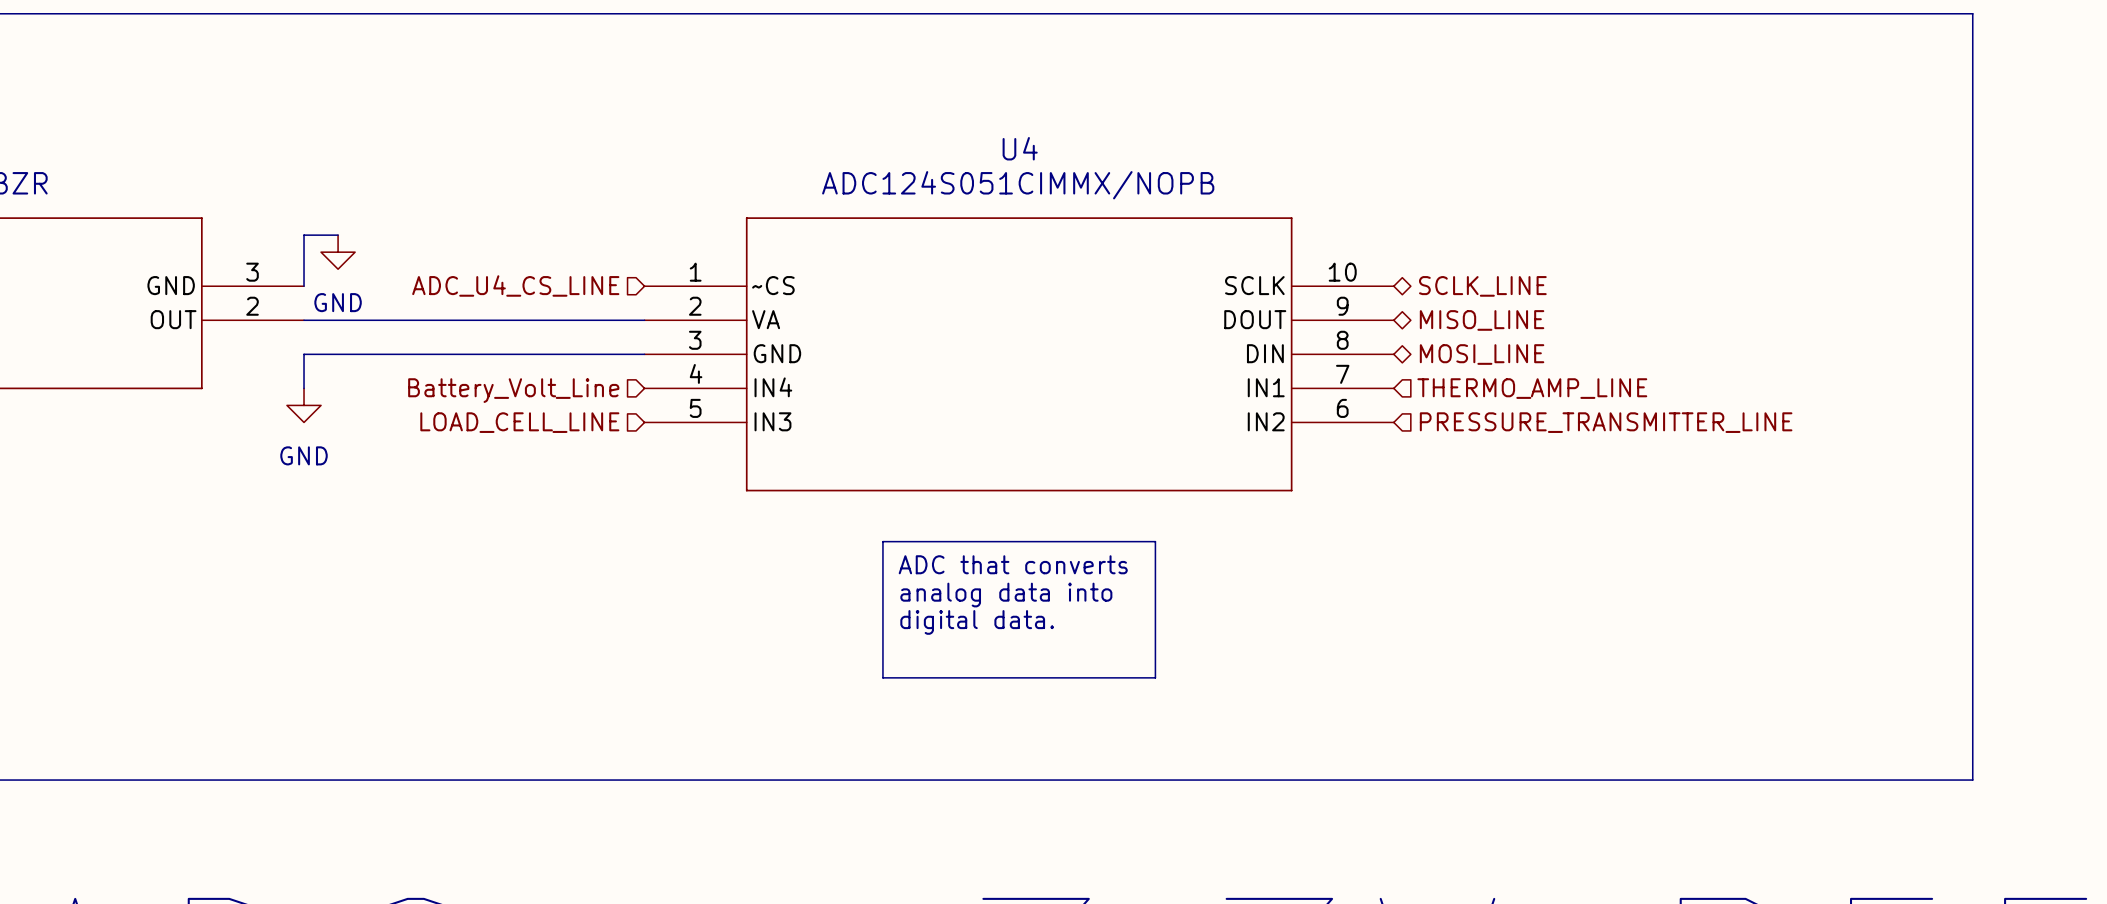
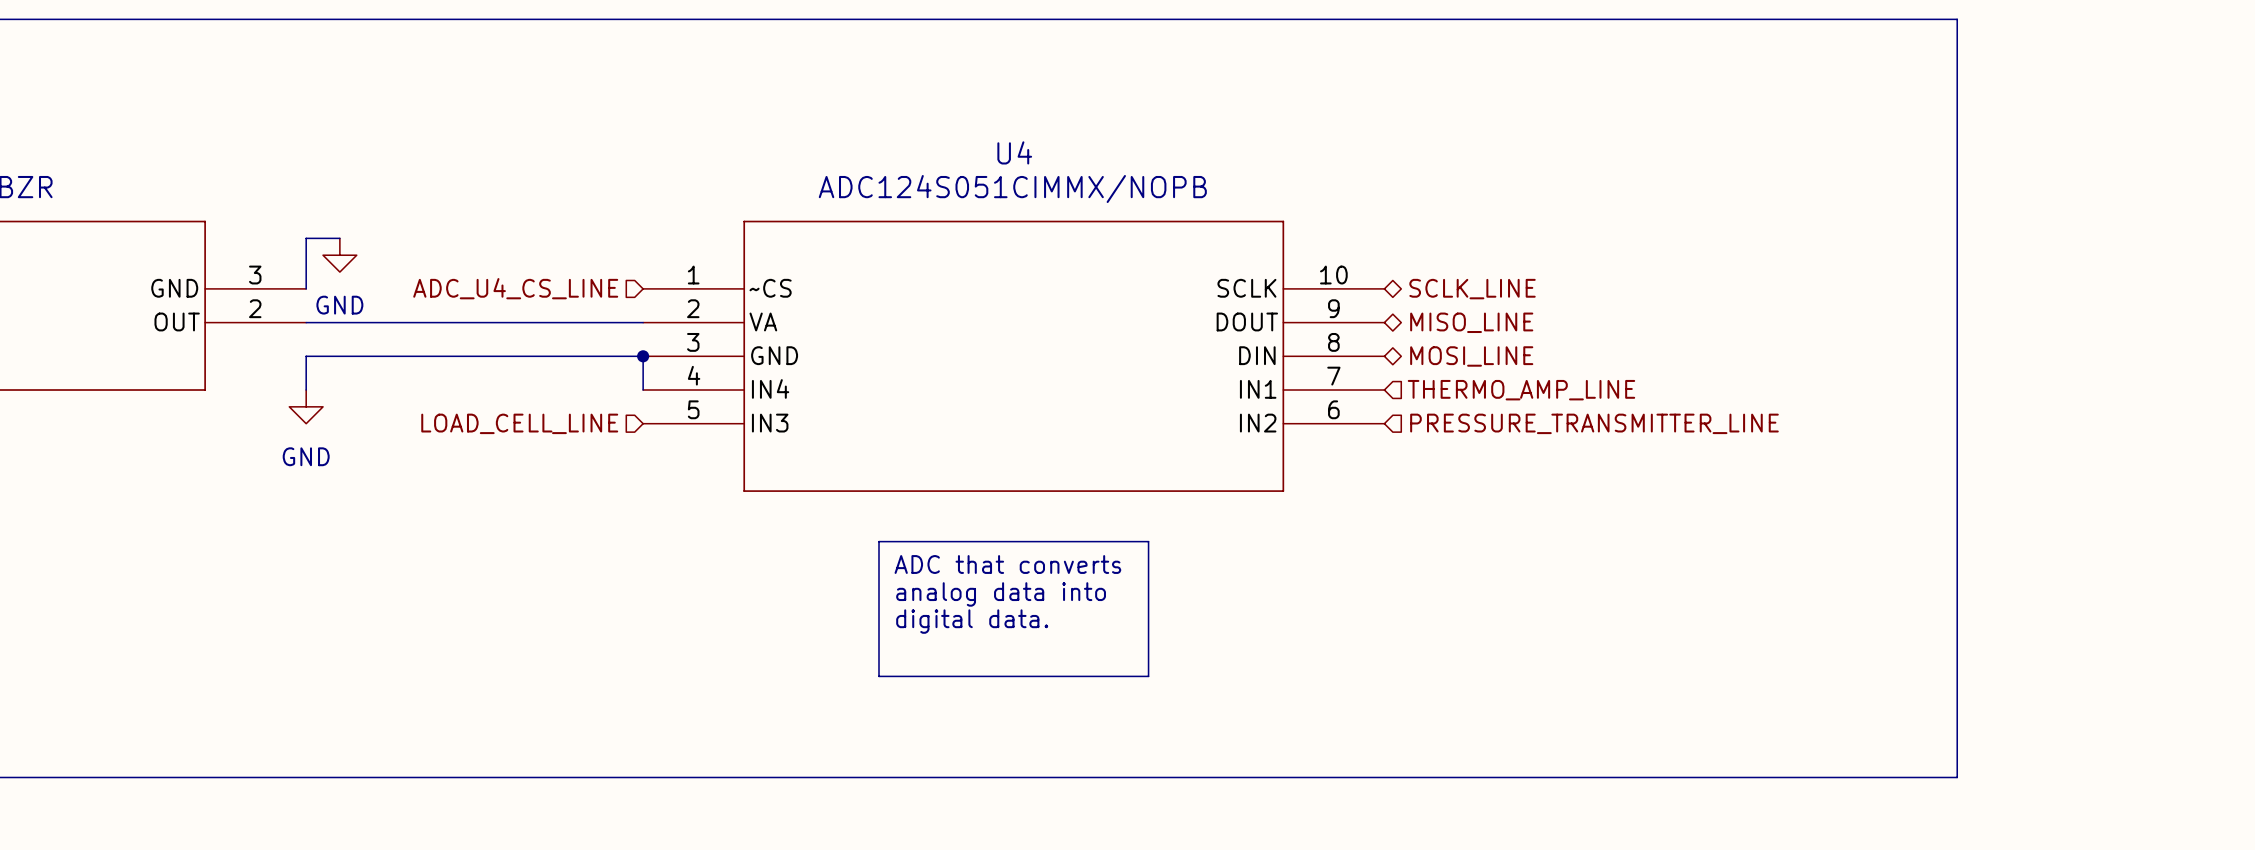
wire: none -> (643, 356) (643, 390)
junction: none -> (643, 356)
hierarchical label: Battery_Volt_Line (513, 390) -> none

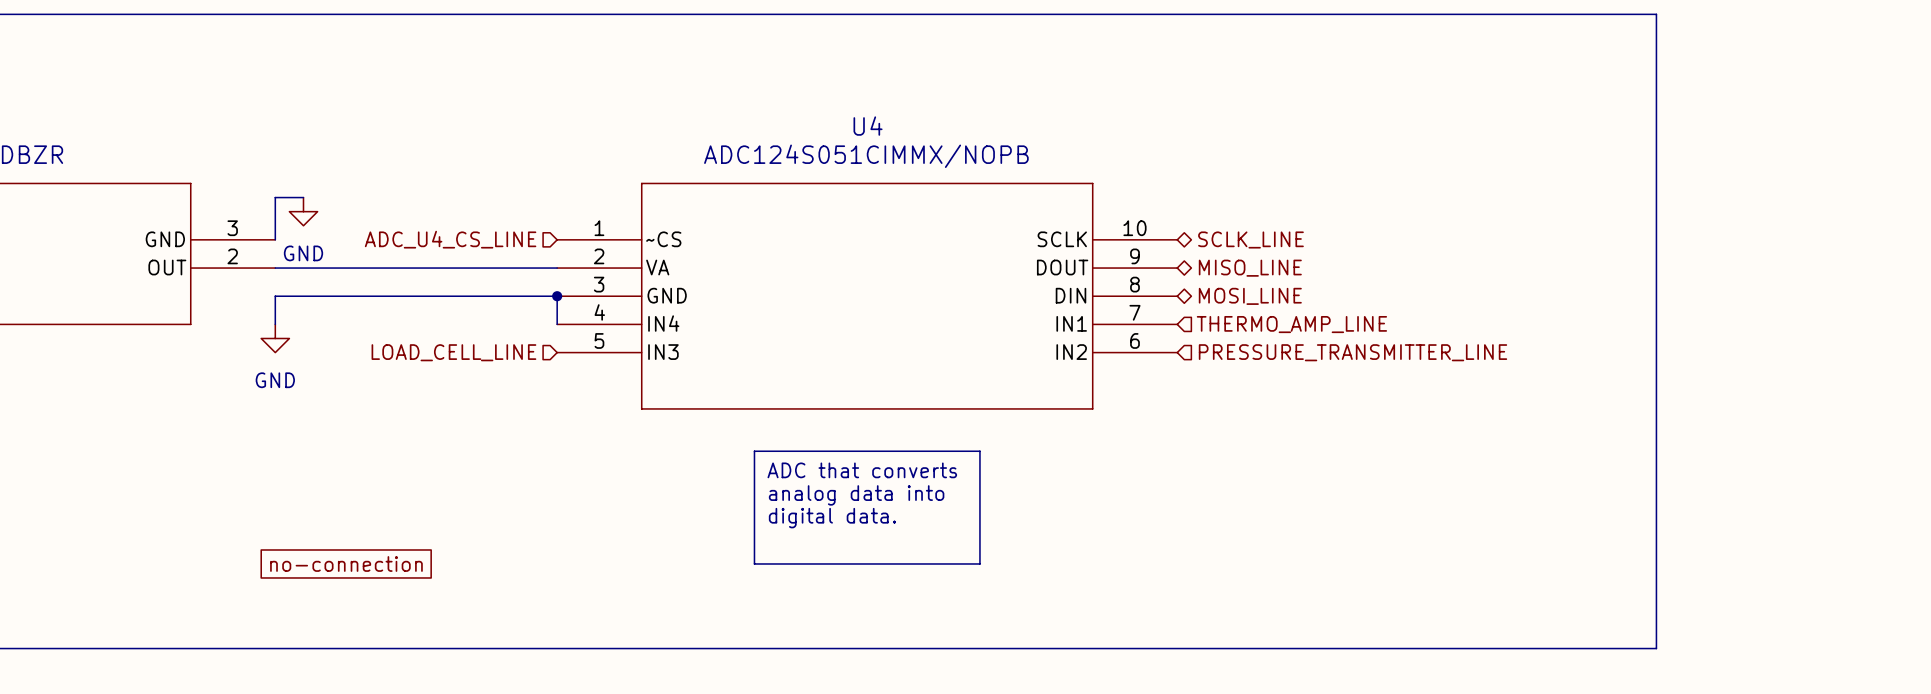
global label: none -> no-connection (346, 563)

